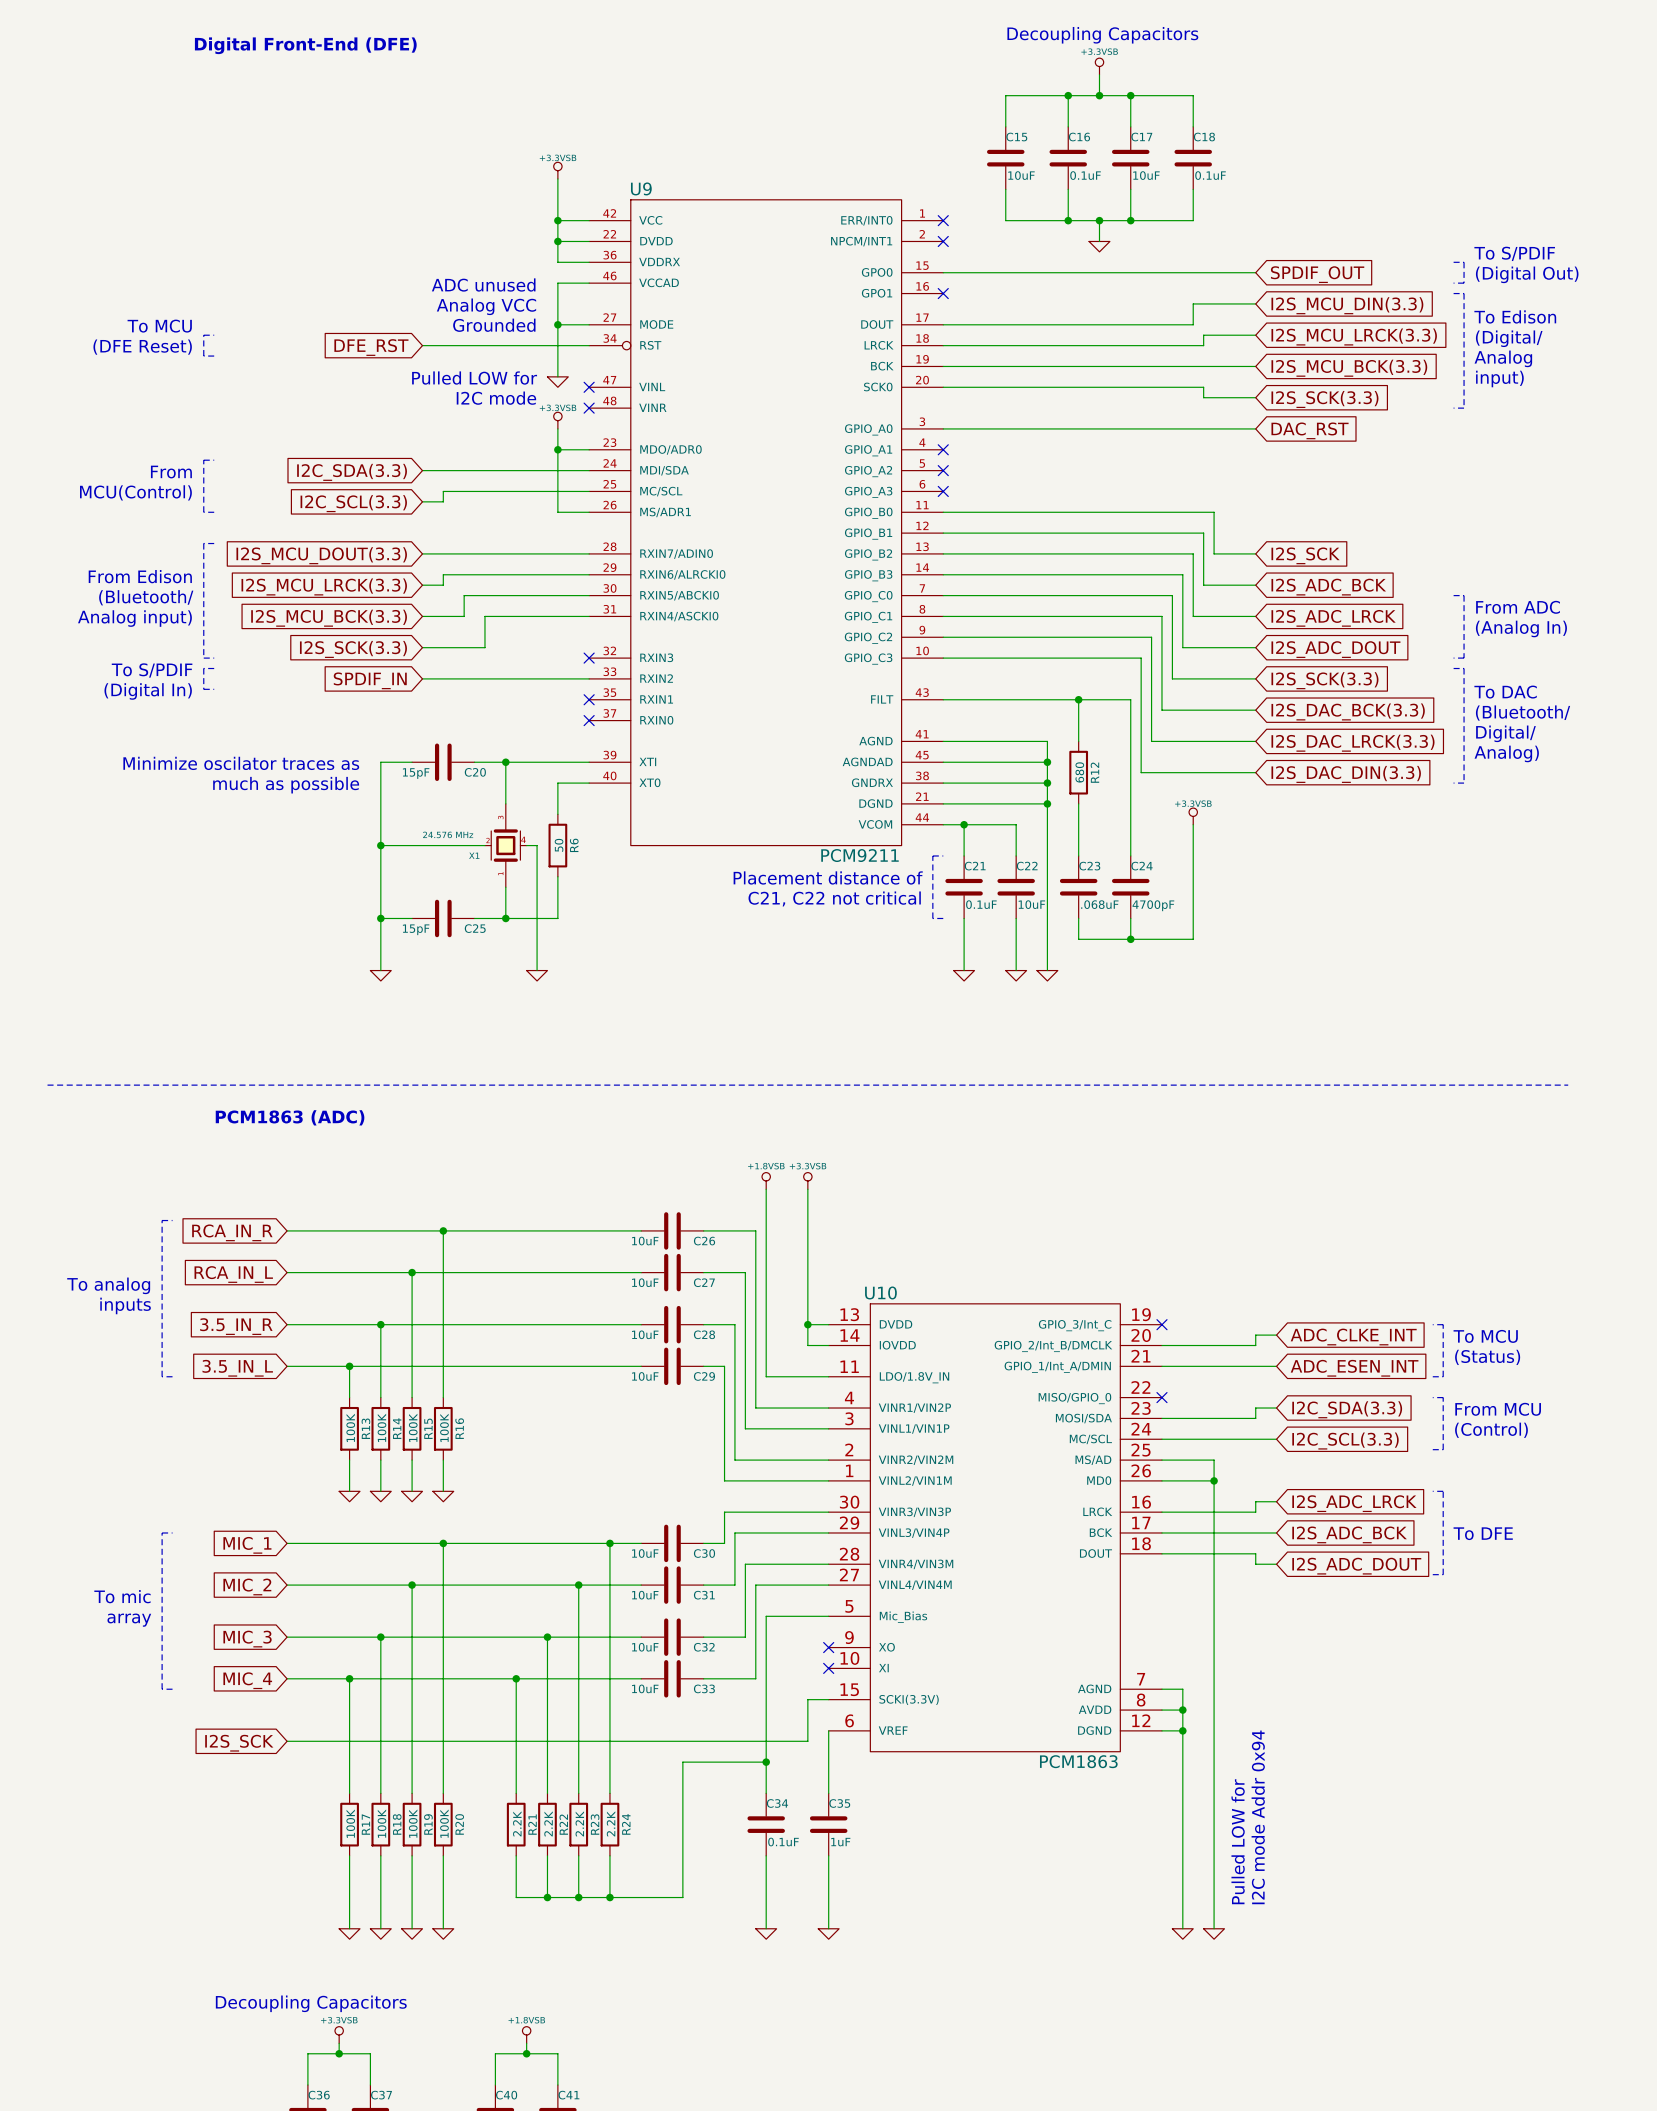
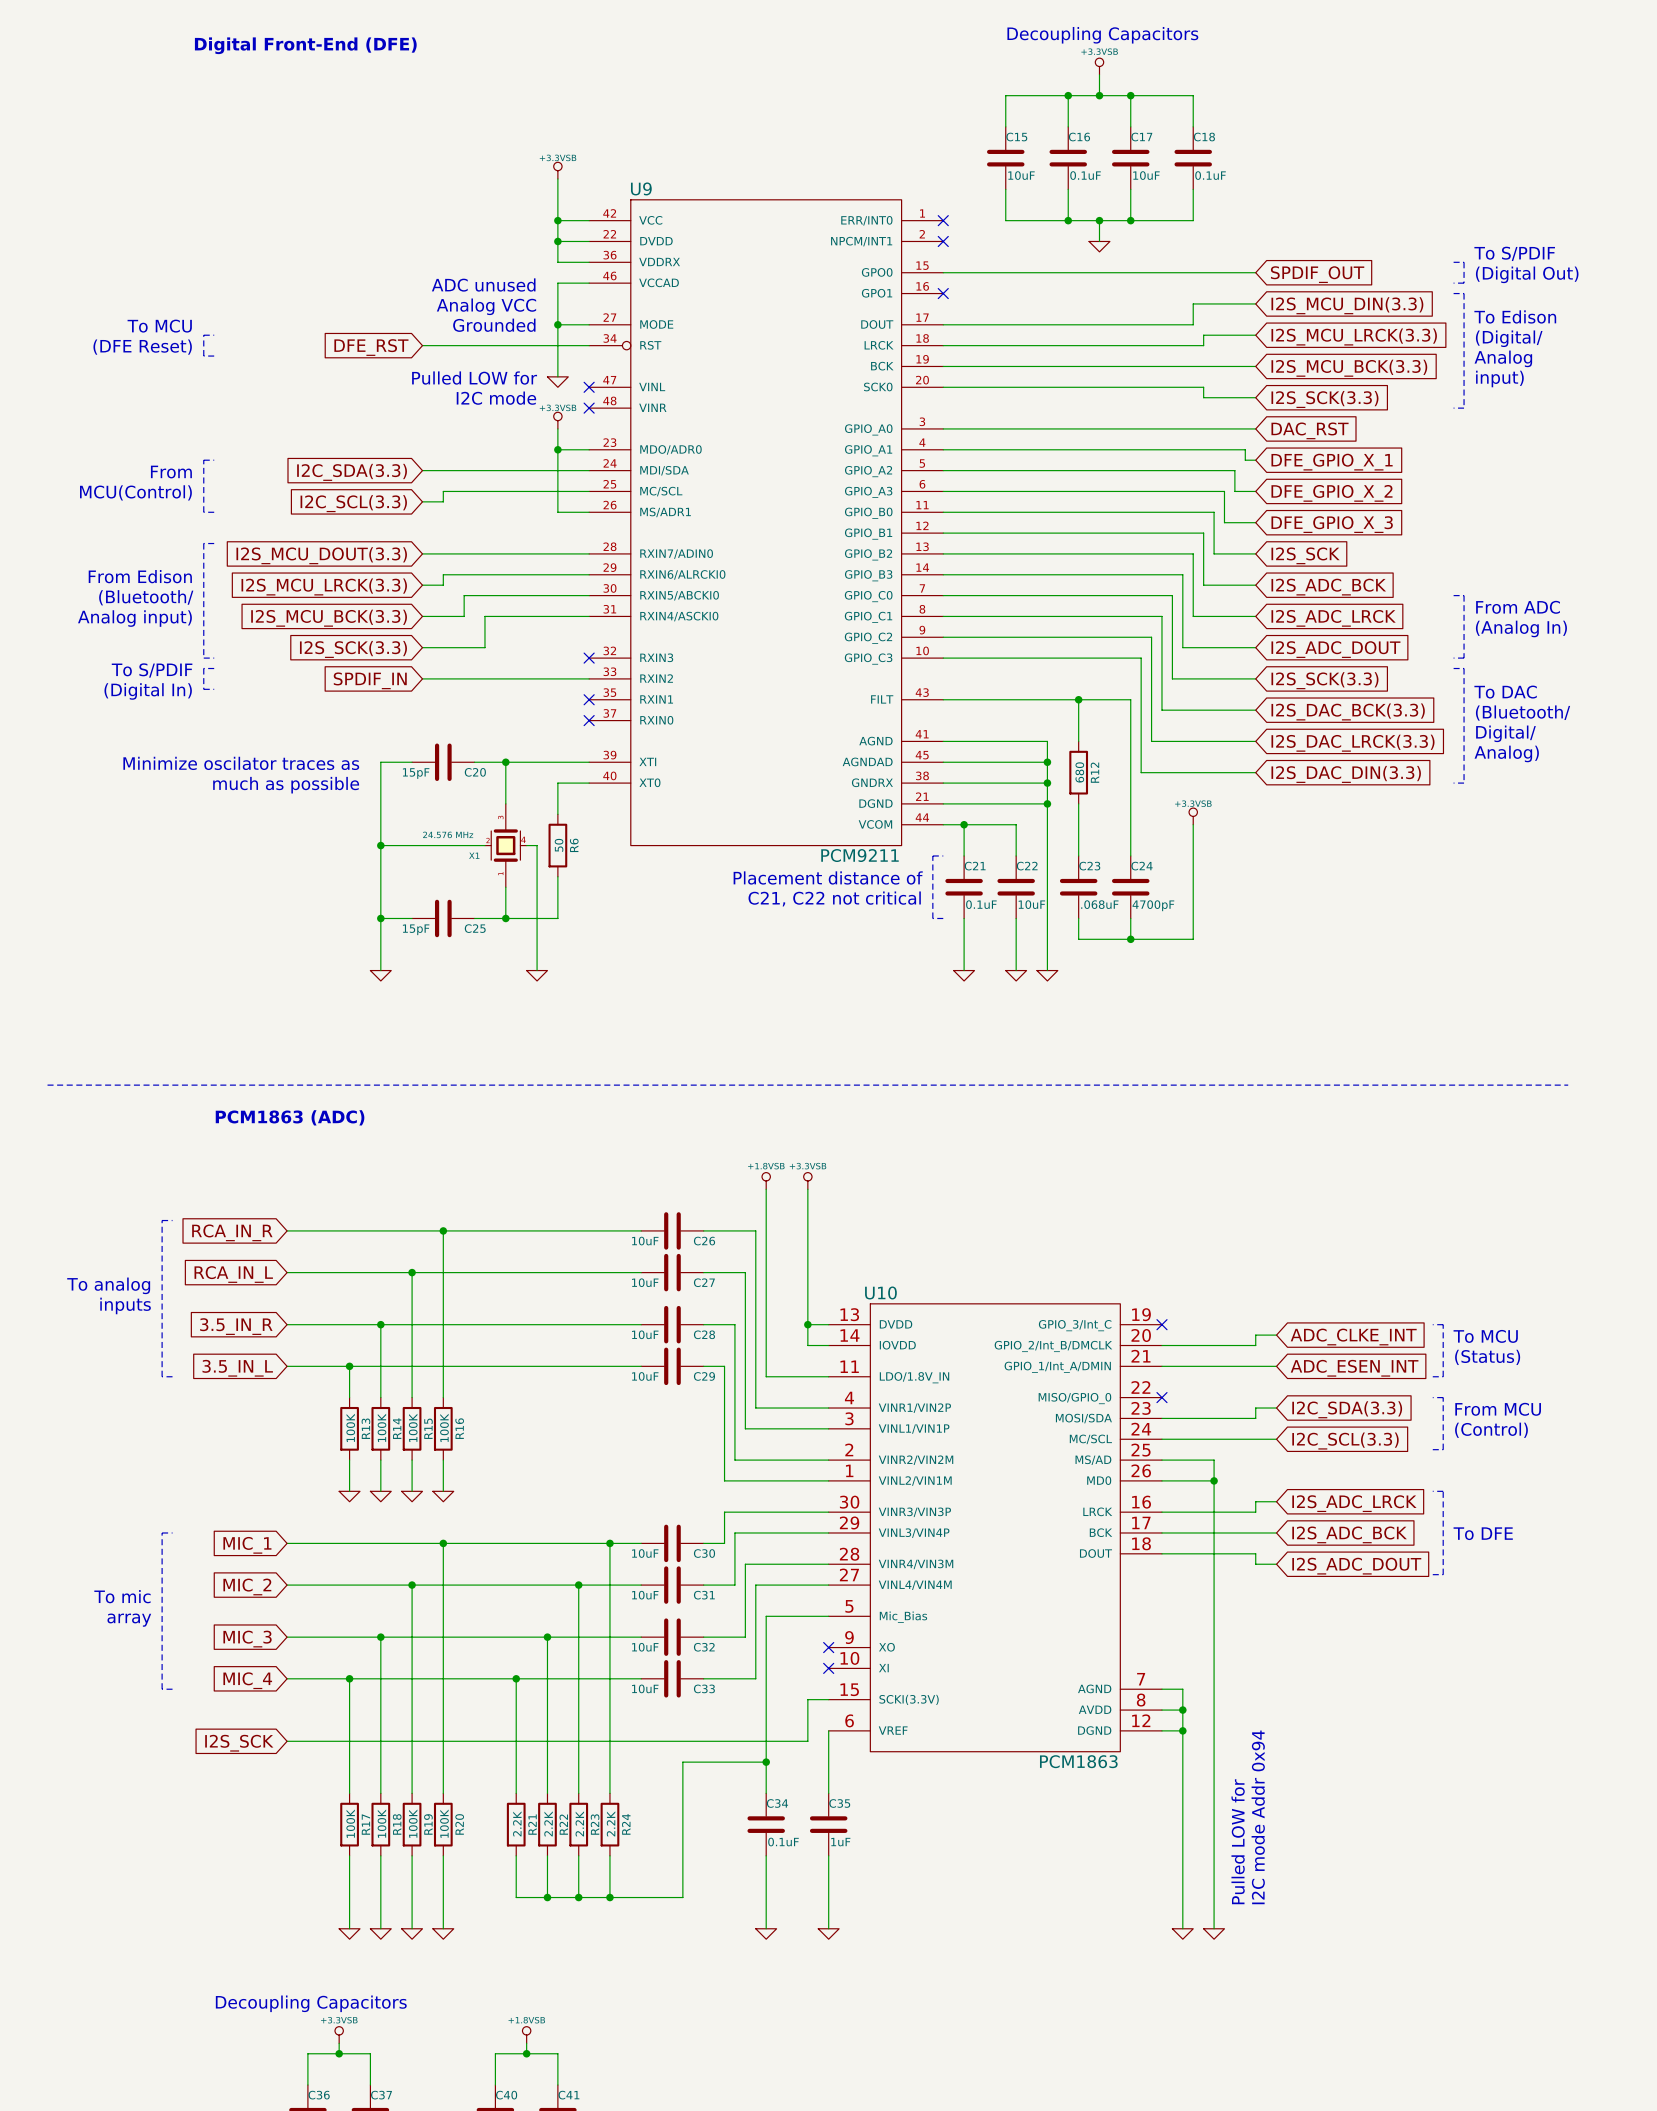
wire: none -> (943, 449) (1245, 449) (1245, 460) (1255, 460)
no-connect mark: (943, 449) -> none
global label: none -> DFE_GPIO_X_1 (1332, 462)
wire: none -> (943, 470) (1234, 470) (1234, 491) (1255, 491)
no-connect mark: (943, 470) -> none
wire: none -> (943, 491) (1224, 491) (1224, 522) (1255, 522)
no-connect mark: (943, 491) -> none
global label: none -> DFE_GPIO_X_2 (1331, 493)
global label: none -> DFE_GPIO_X_3 (1332, 524)

